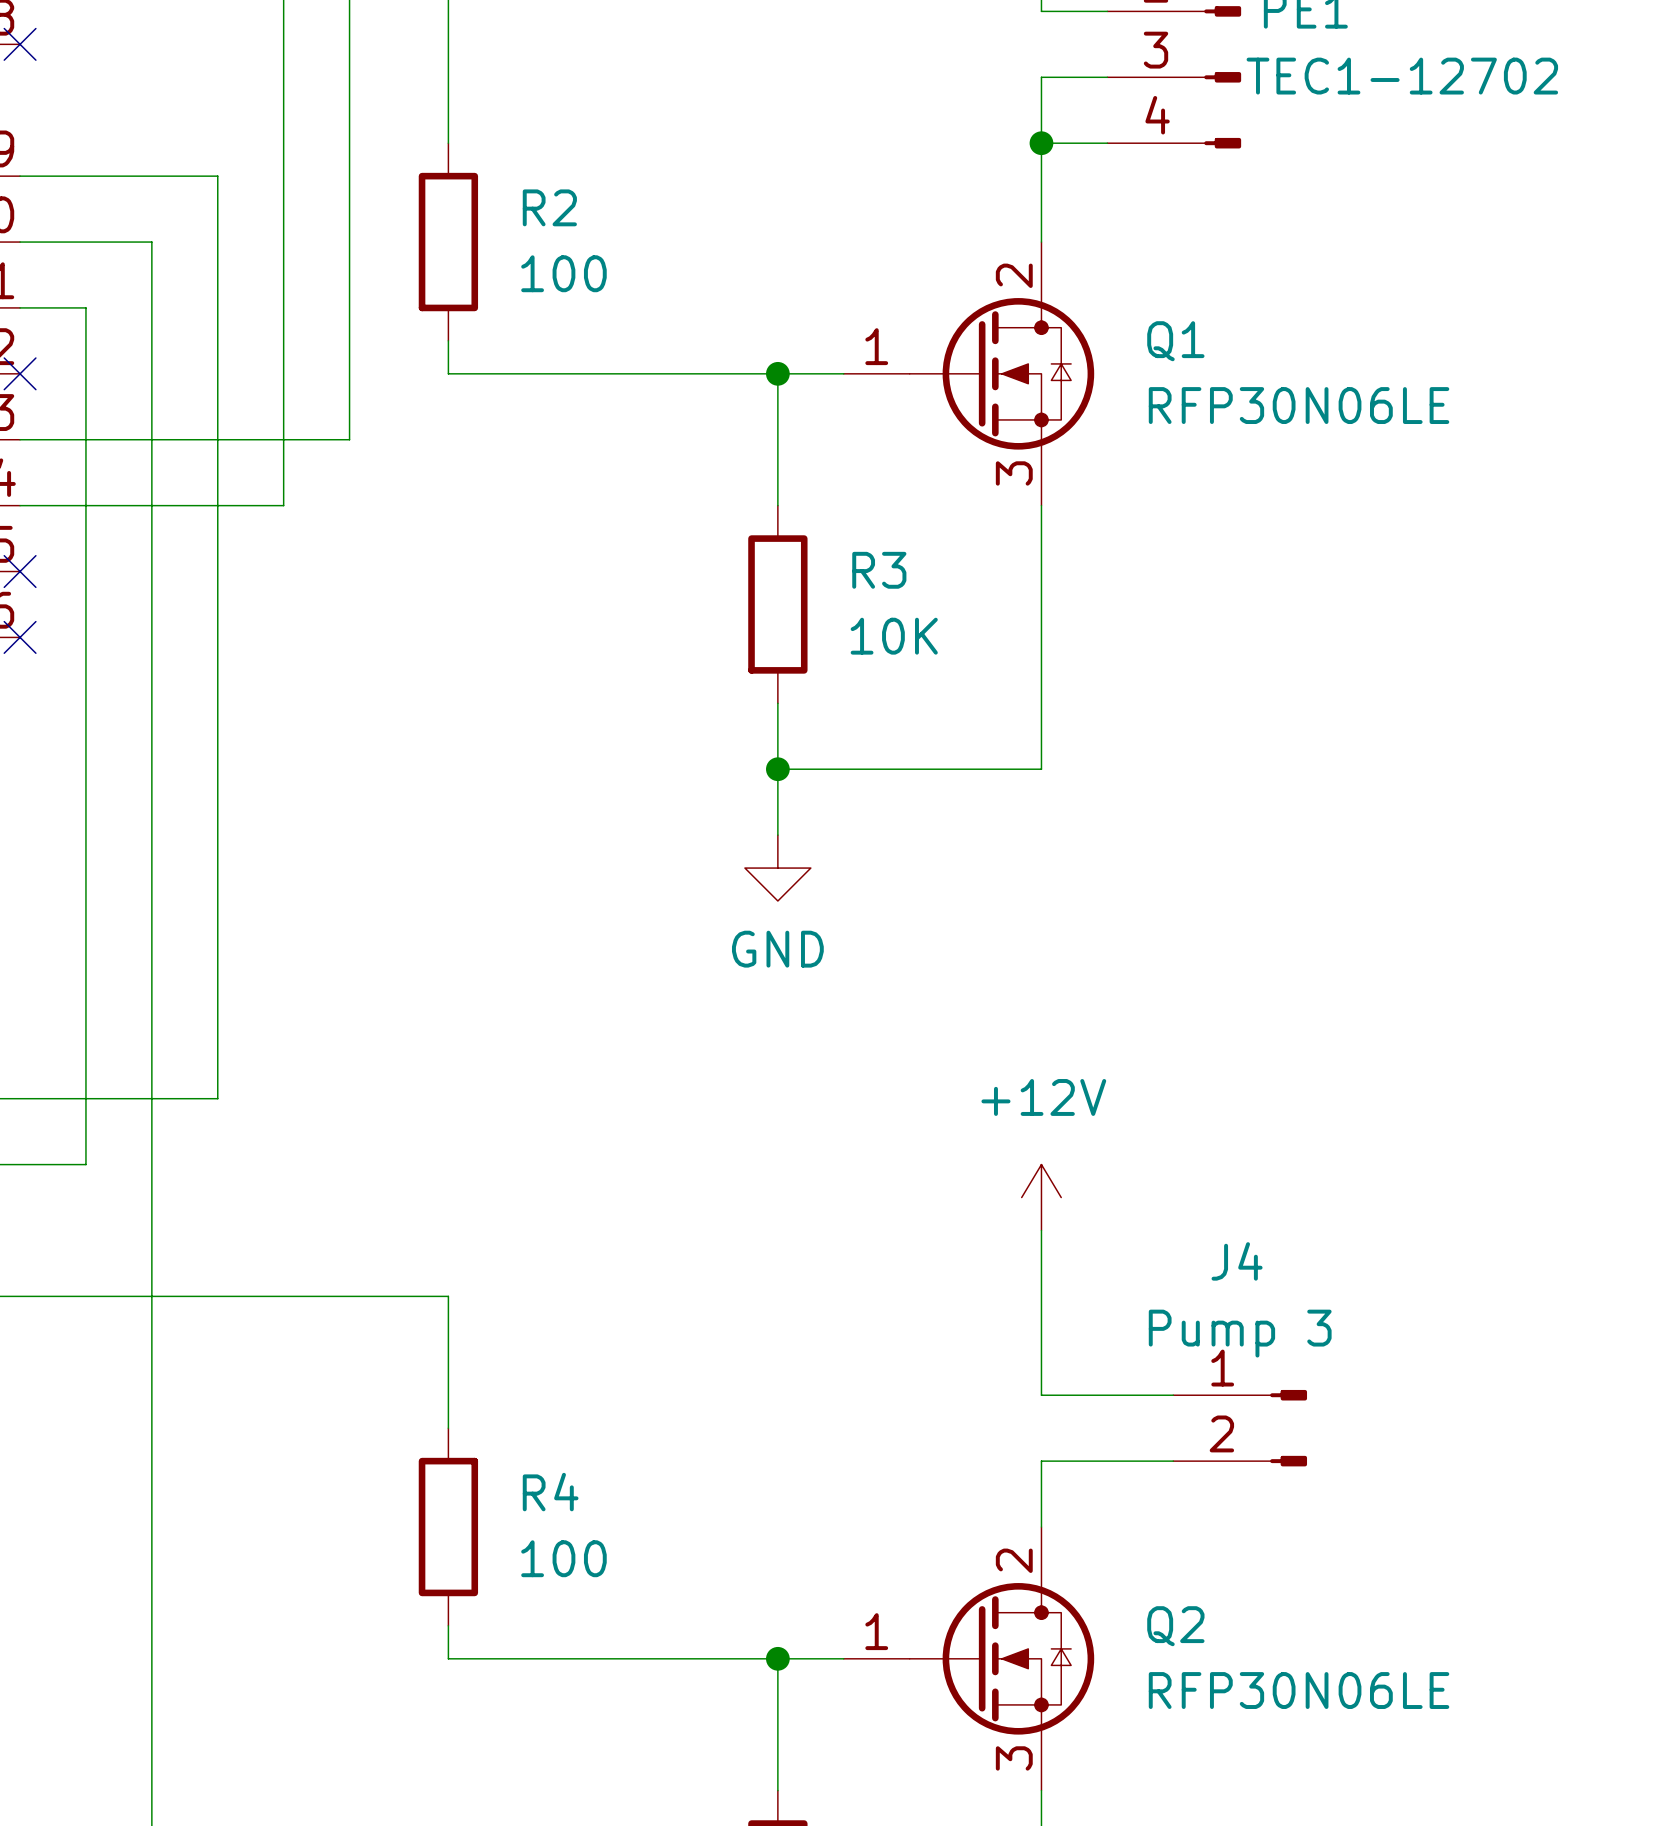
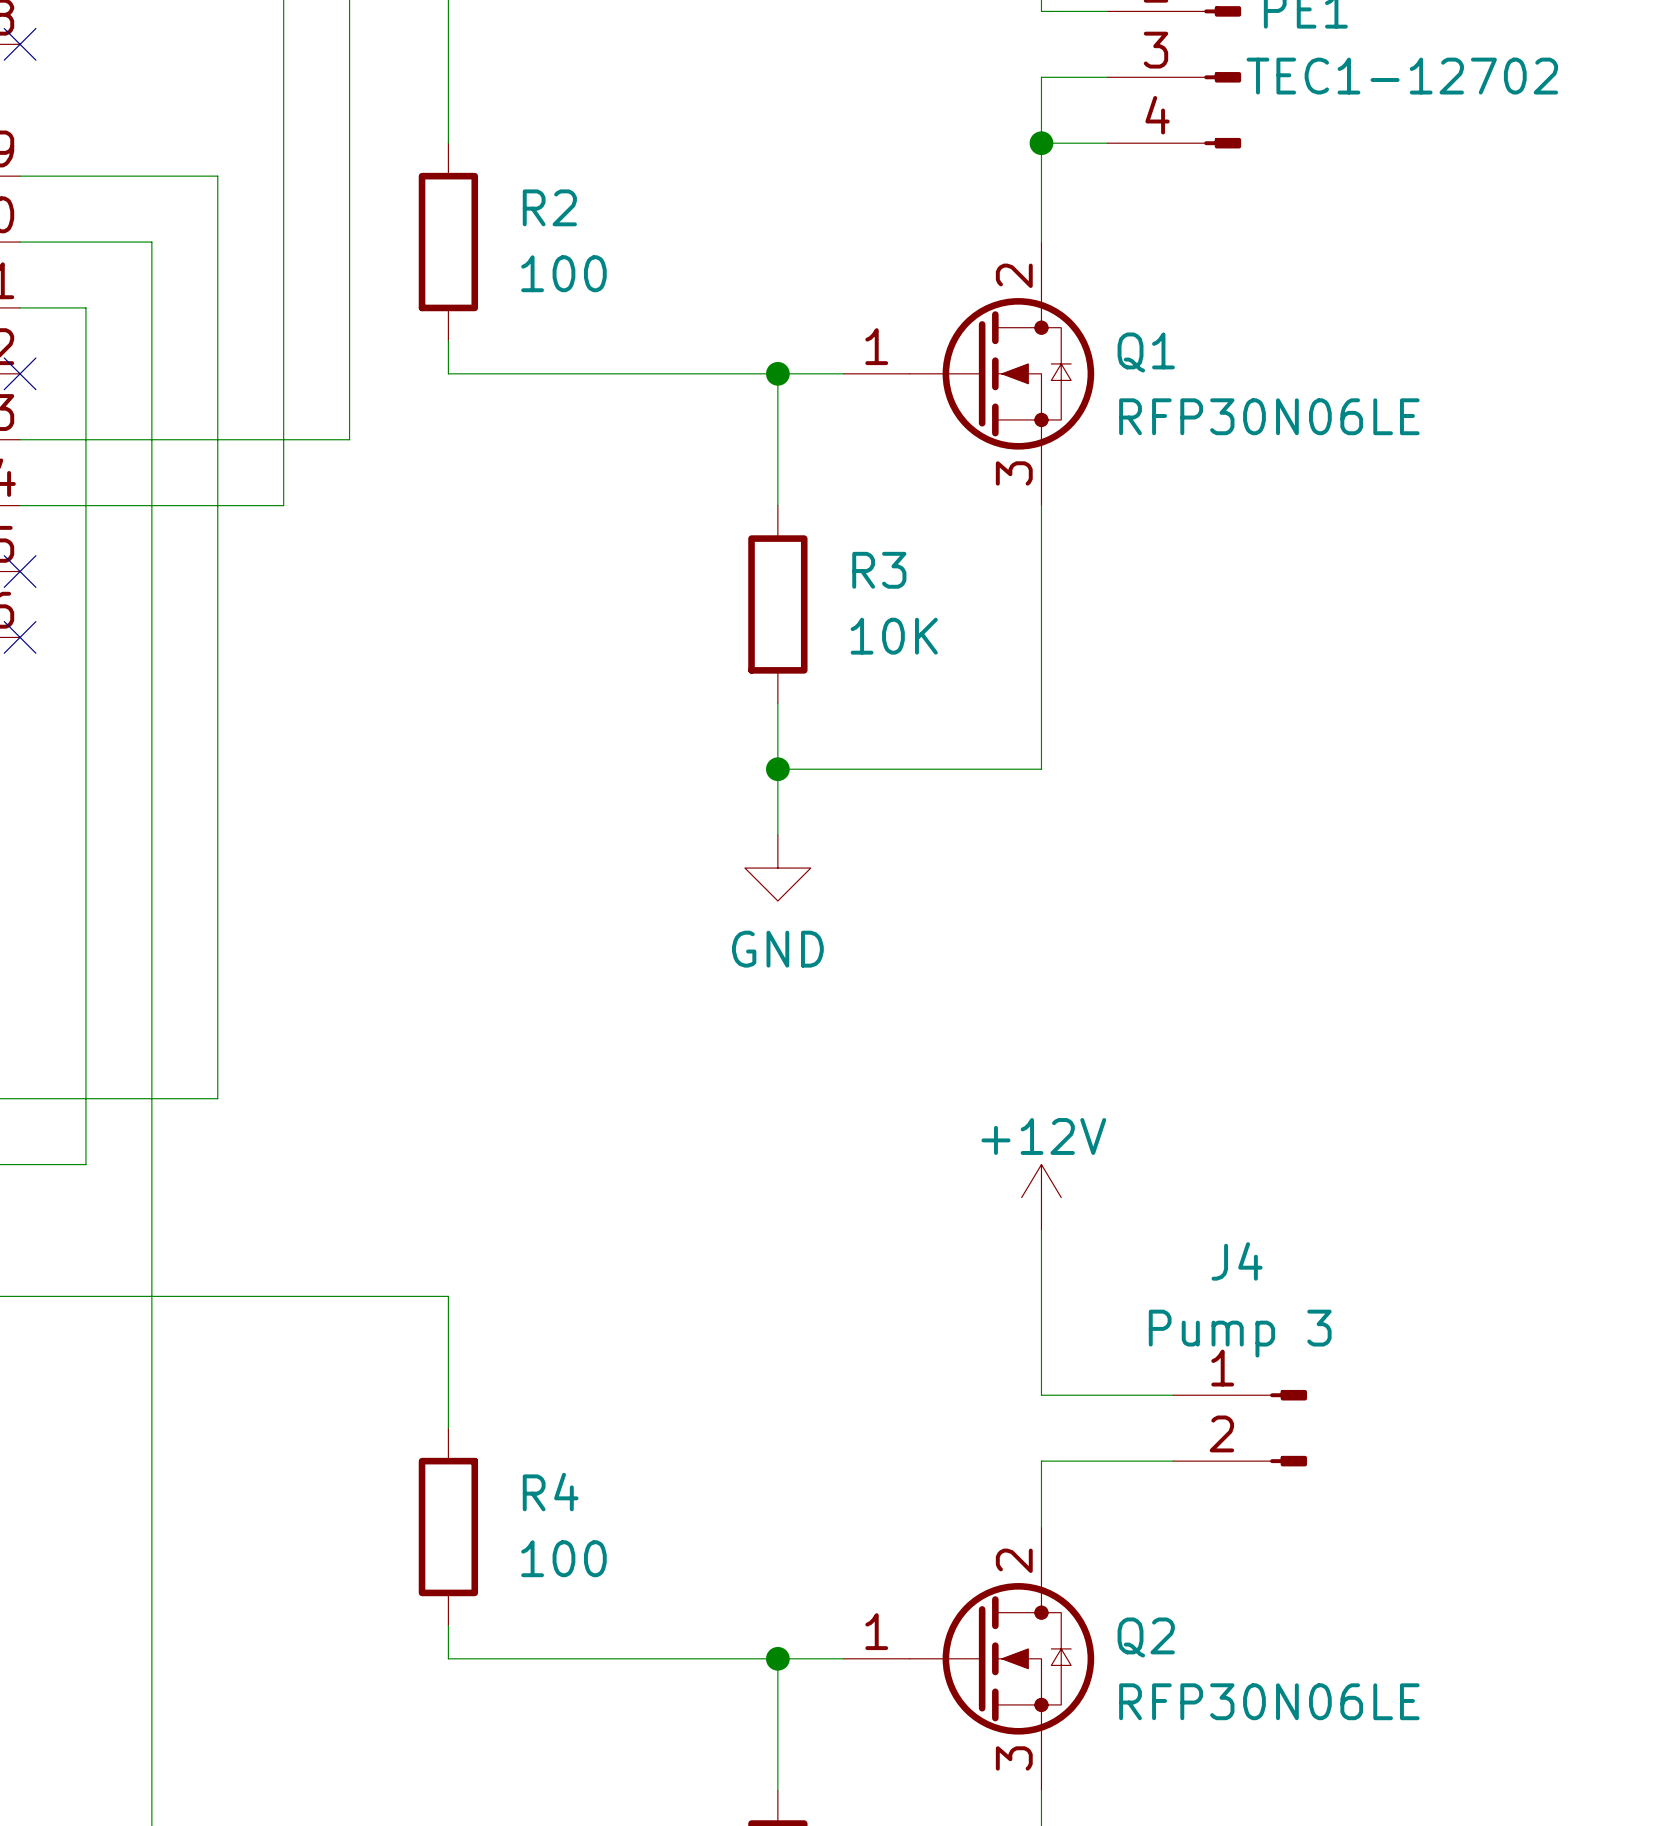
Q1 name position: Q1 (1175, 341) -> Q1 (1146, 352)
Q1 value position: RFP30N06LE (1299, 405) -> RFP30N06LE (1269, 416)
power symbol text position: +12V (1043, 1097) -> +12V (1043, 1136)
Q2 name position: Q2 (1175, 1626) -> Q2 (1146, 1637)
Q2 value position: RFP30N06LE (1299, 1690) -> RFP30N06LE (1269, 1701)

